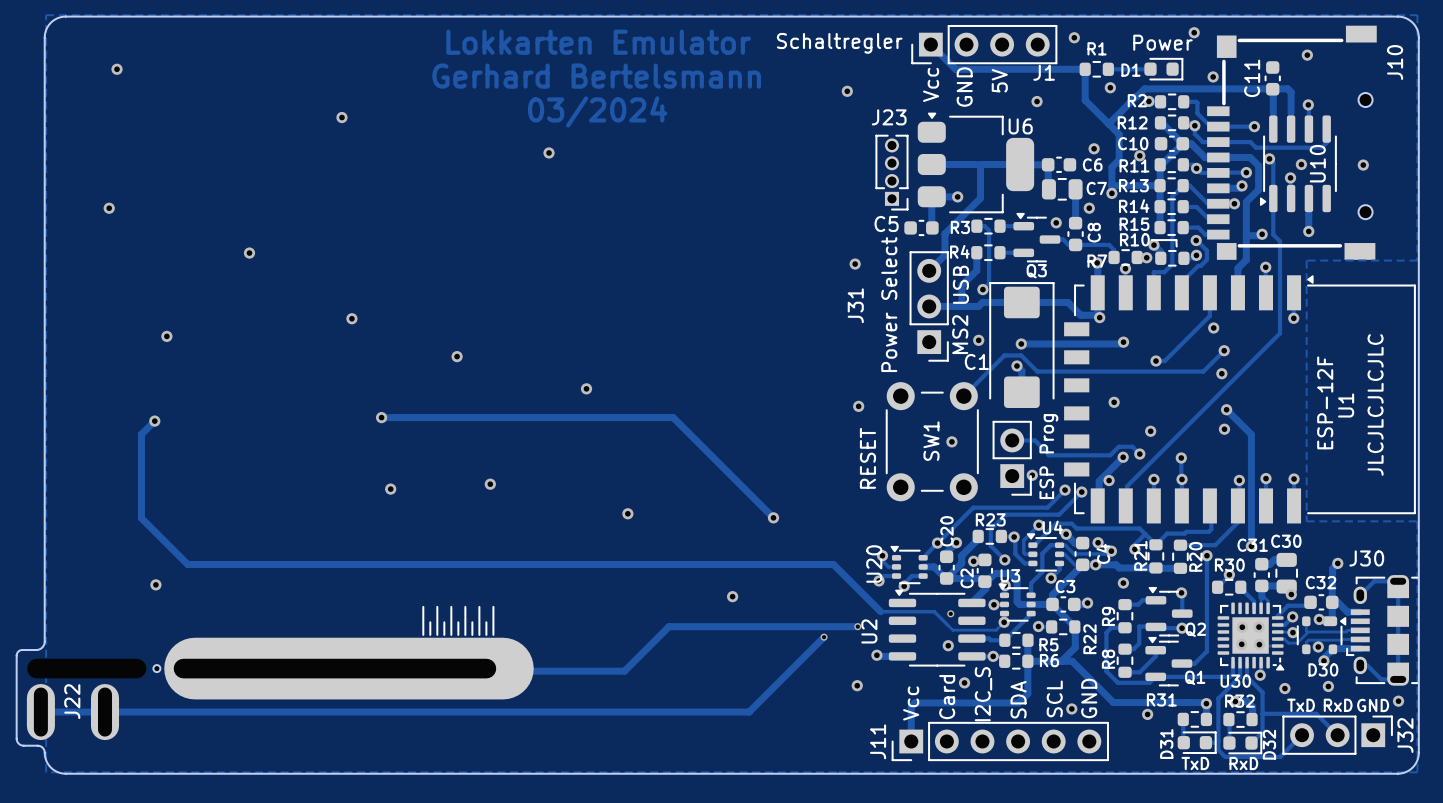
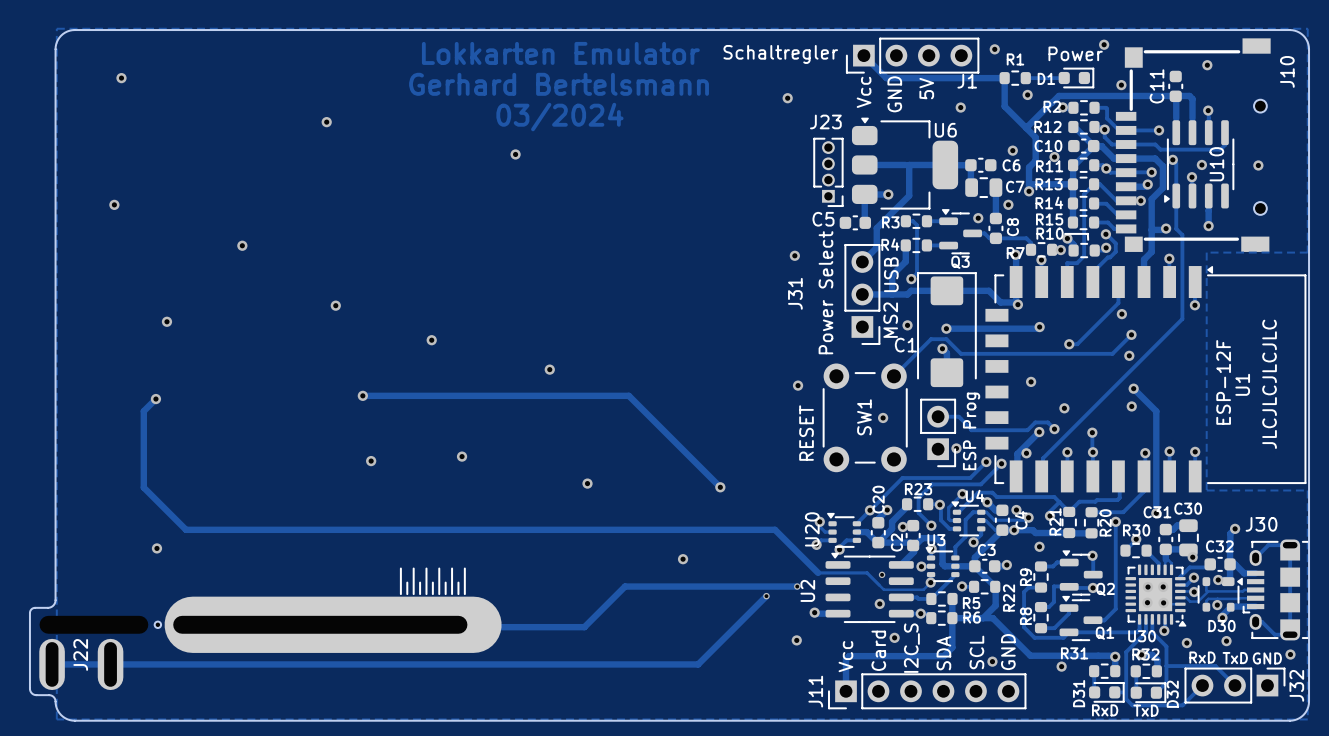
text: TxD (1301, 705) -> RxD (1202, 657)
text: RxD (1338, 705) -> TxD (1235, 658)
text: TxD (1195, 763) -> RxD (1105, 710)
text: RxD (1243, 763) -> TxD (1145, 710)

